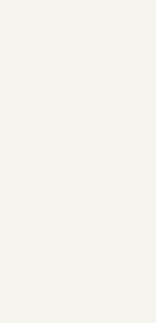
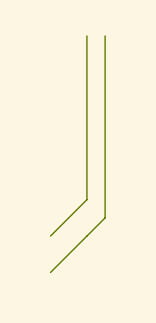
wire: none -> (86, 35) (86, 199) (50, 236)
wire: none -> (105, 35) (105, 217) (50, 272)

